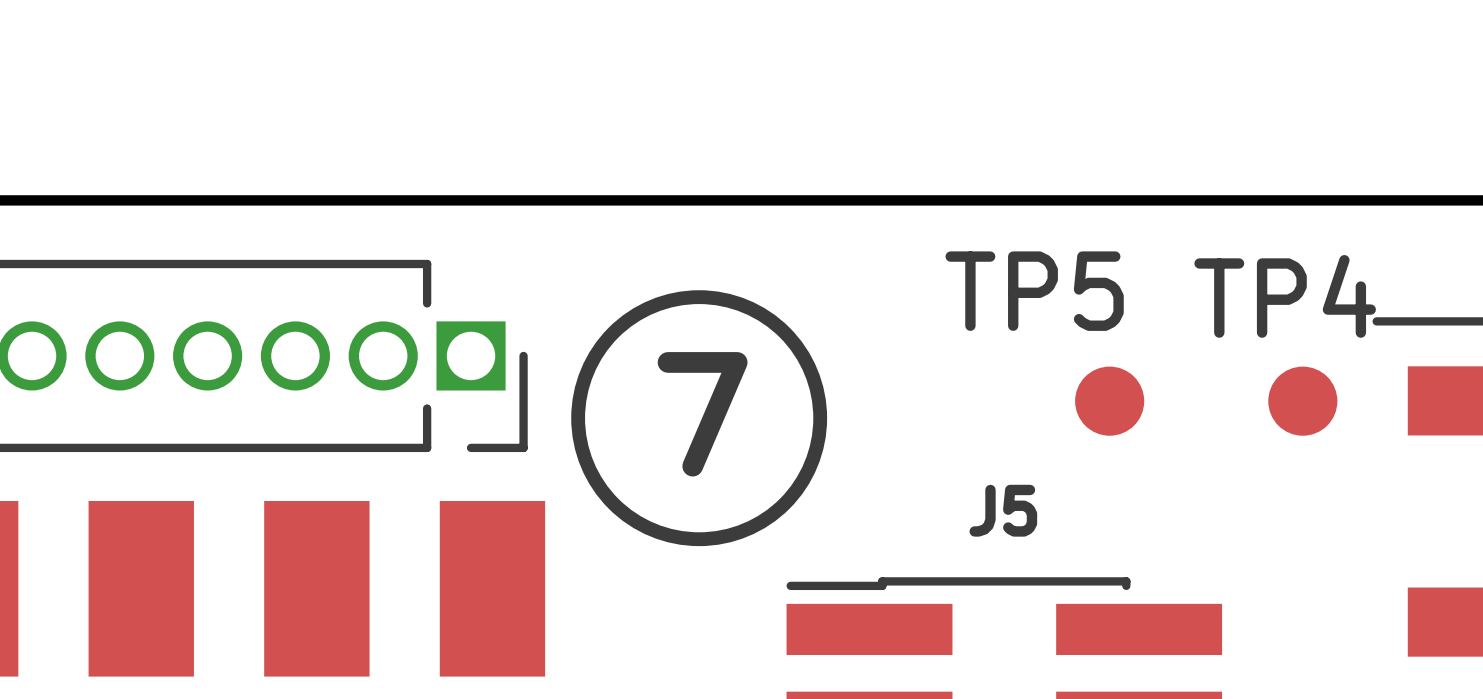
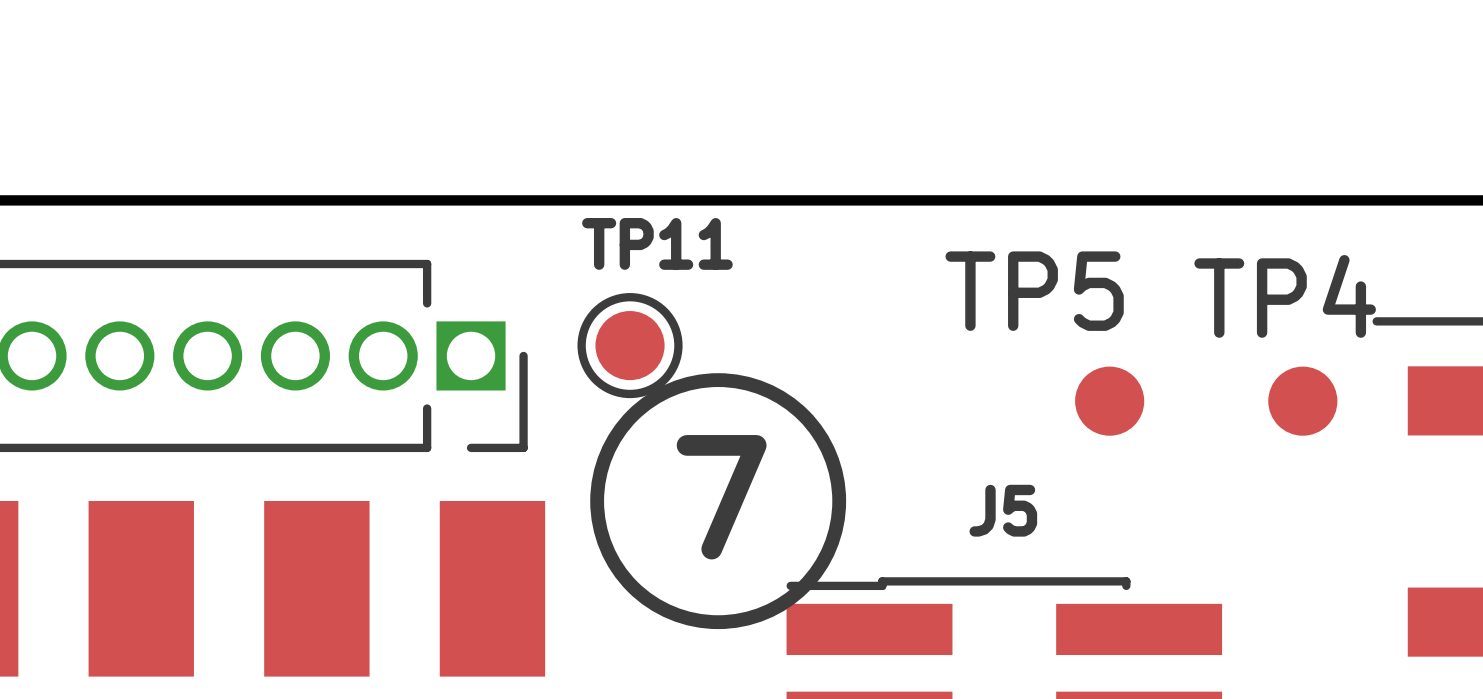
TP11: none -> (630, 345)
text position: 7 (702, 414) -> 7 (721, 497)
drawing position: (699, 418) -> (718, 501)

